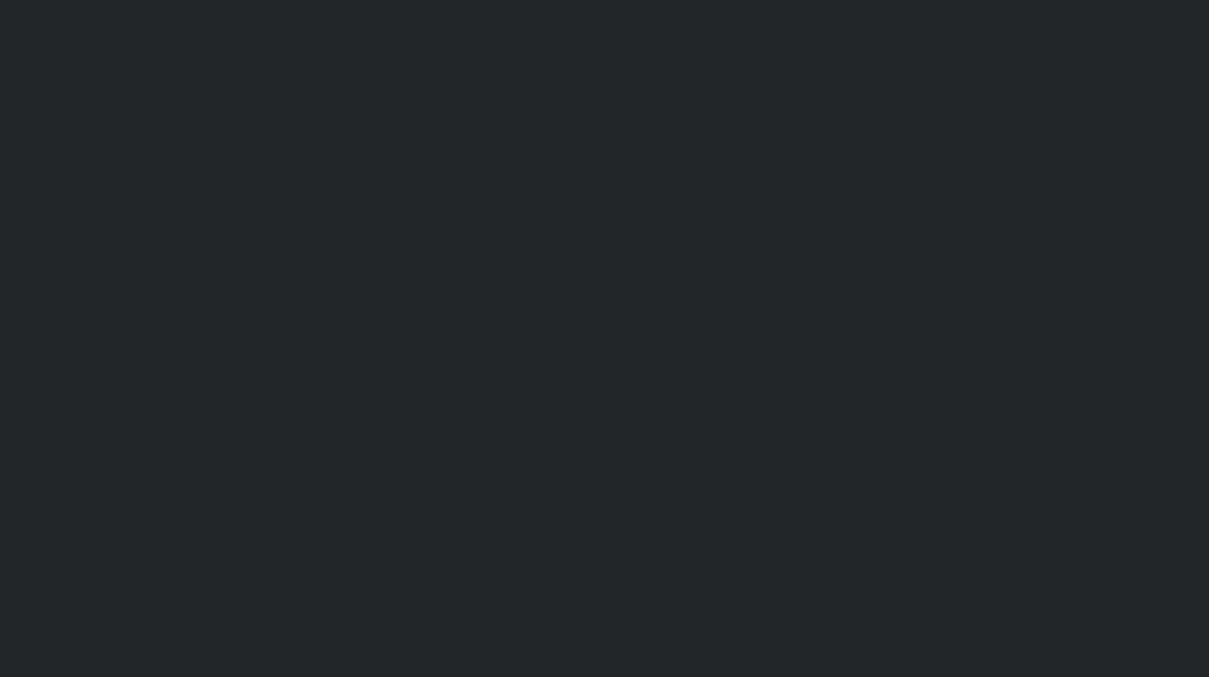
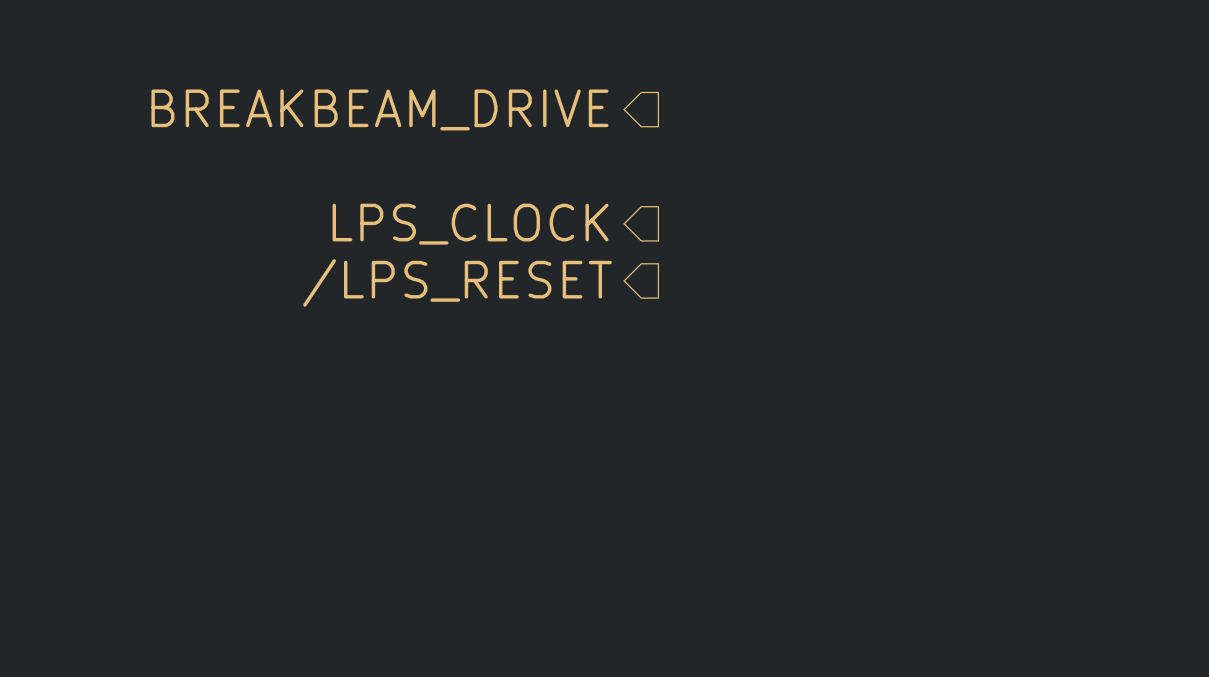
hierarchical label: none -> BREAKBEAM_DRIVE (379, 109)
hierarchical label: none -> LPS_CLOCK (470, 224)
hierarchical label: none -> /LPS_RESET (457, 282)

